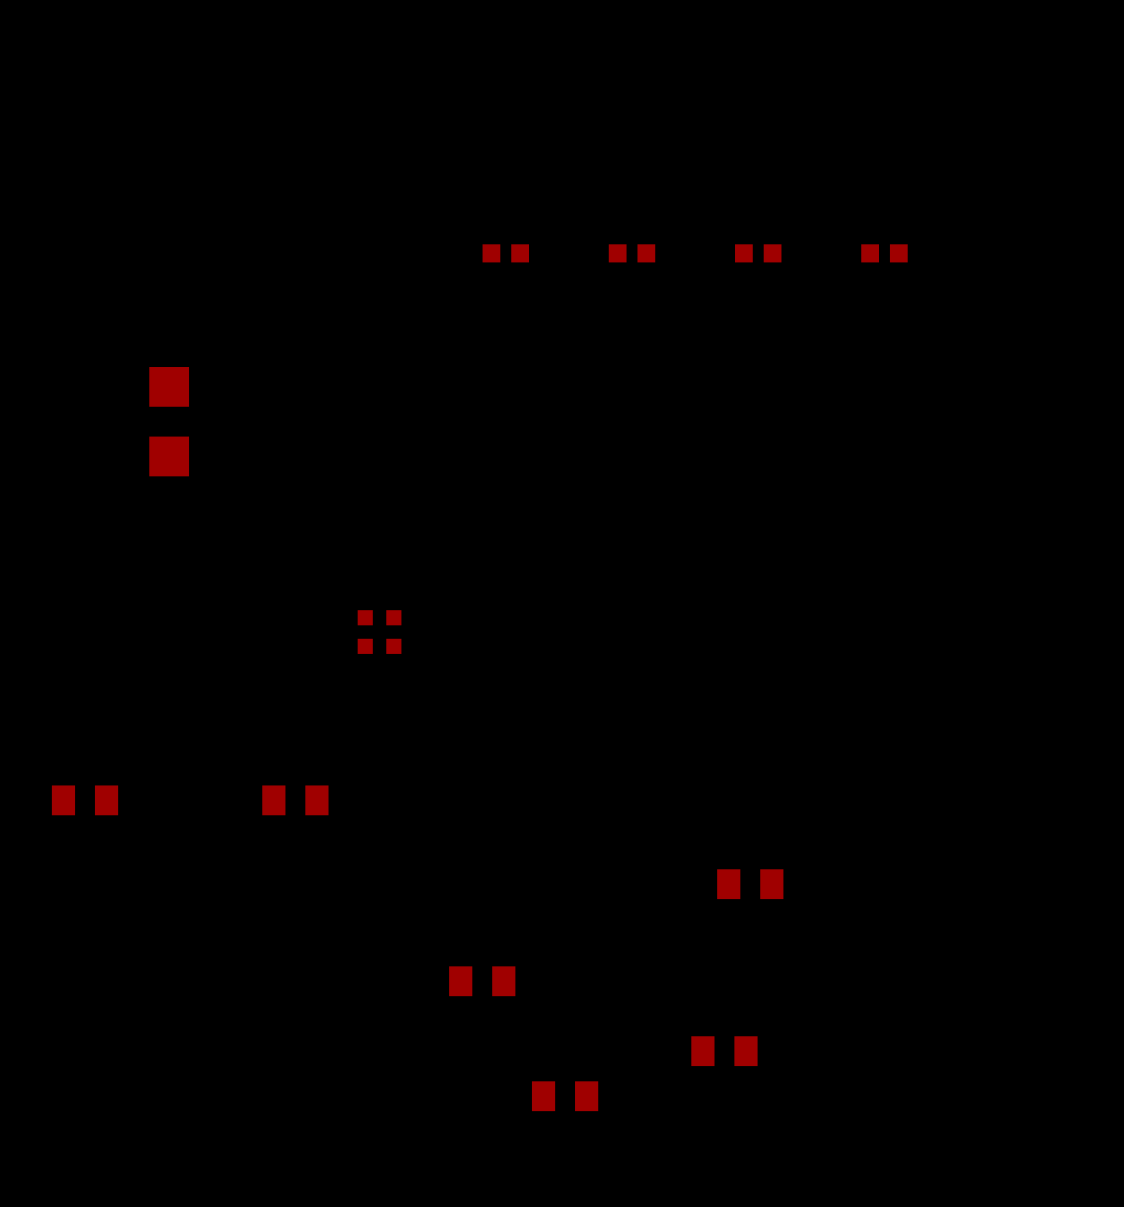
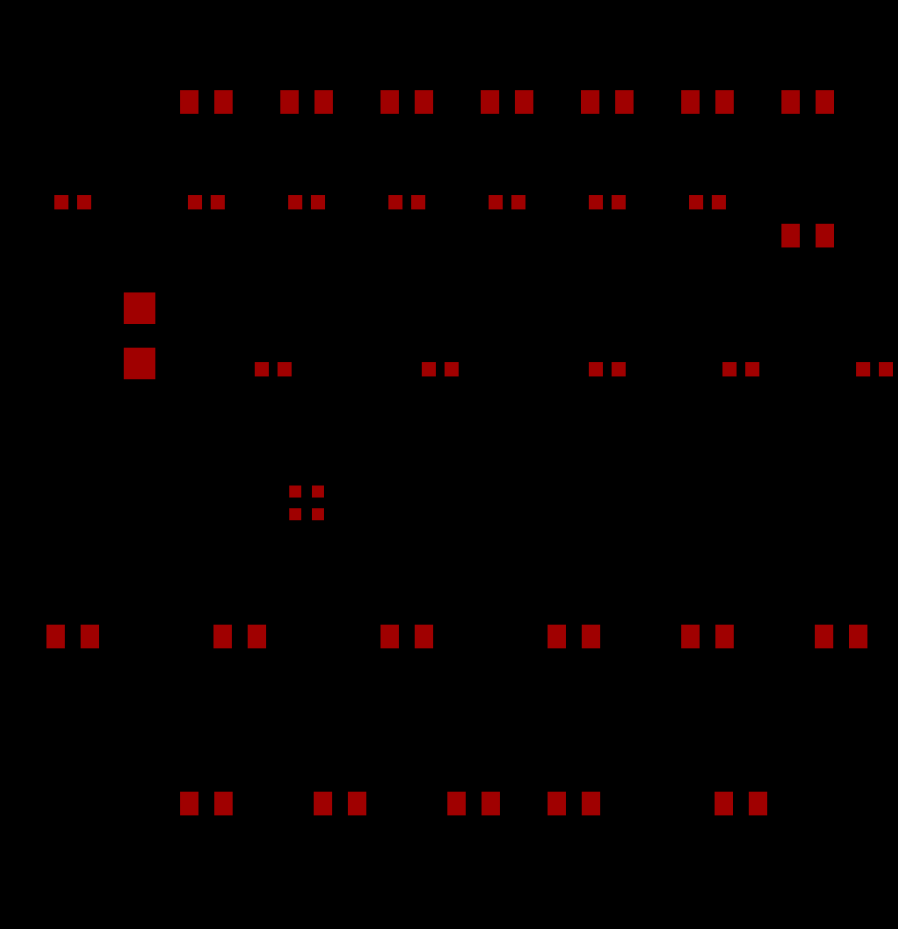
part: none -> (206, 101)
part: none -> (306, 101)
part: none -> (406, 101)
part: none -> (507, 101)
part: none -> (607, 101)
part: none -> (707, 101)
part: none -> (807, 101)
part: none -> (72, 202)
part: none -> (206, 202)
part: none -> (306, 202)
part: none -> (807, 235)
part: none -> (273, 369)
part: none -> (440, 369)
part: none -> (607, 369)
part: none -> (740, 369)
part: none -> (874, 369)
part: none -> (406, 636)
part: none -> (573, 636)
part: none -> (707, 636)
part: none -> (841, 636)
part: (750, 884) -> none
part: (482, 981) -> none
part: none -> (206, 803)
part: none -> (340, 803)
part: none -> (473, 803)
part: none -> (740, 803)
part position: (724, 1051) -> (573, 803)
part: (565, 1096) -> none

